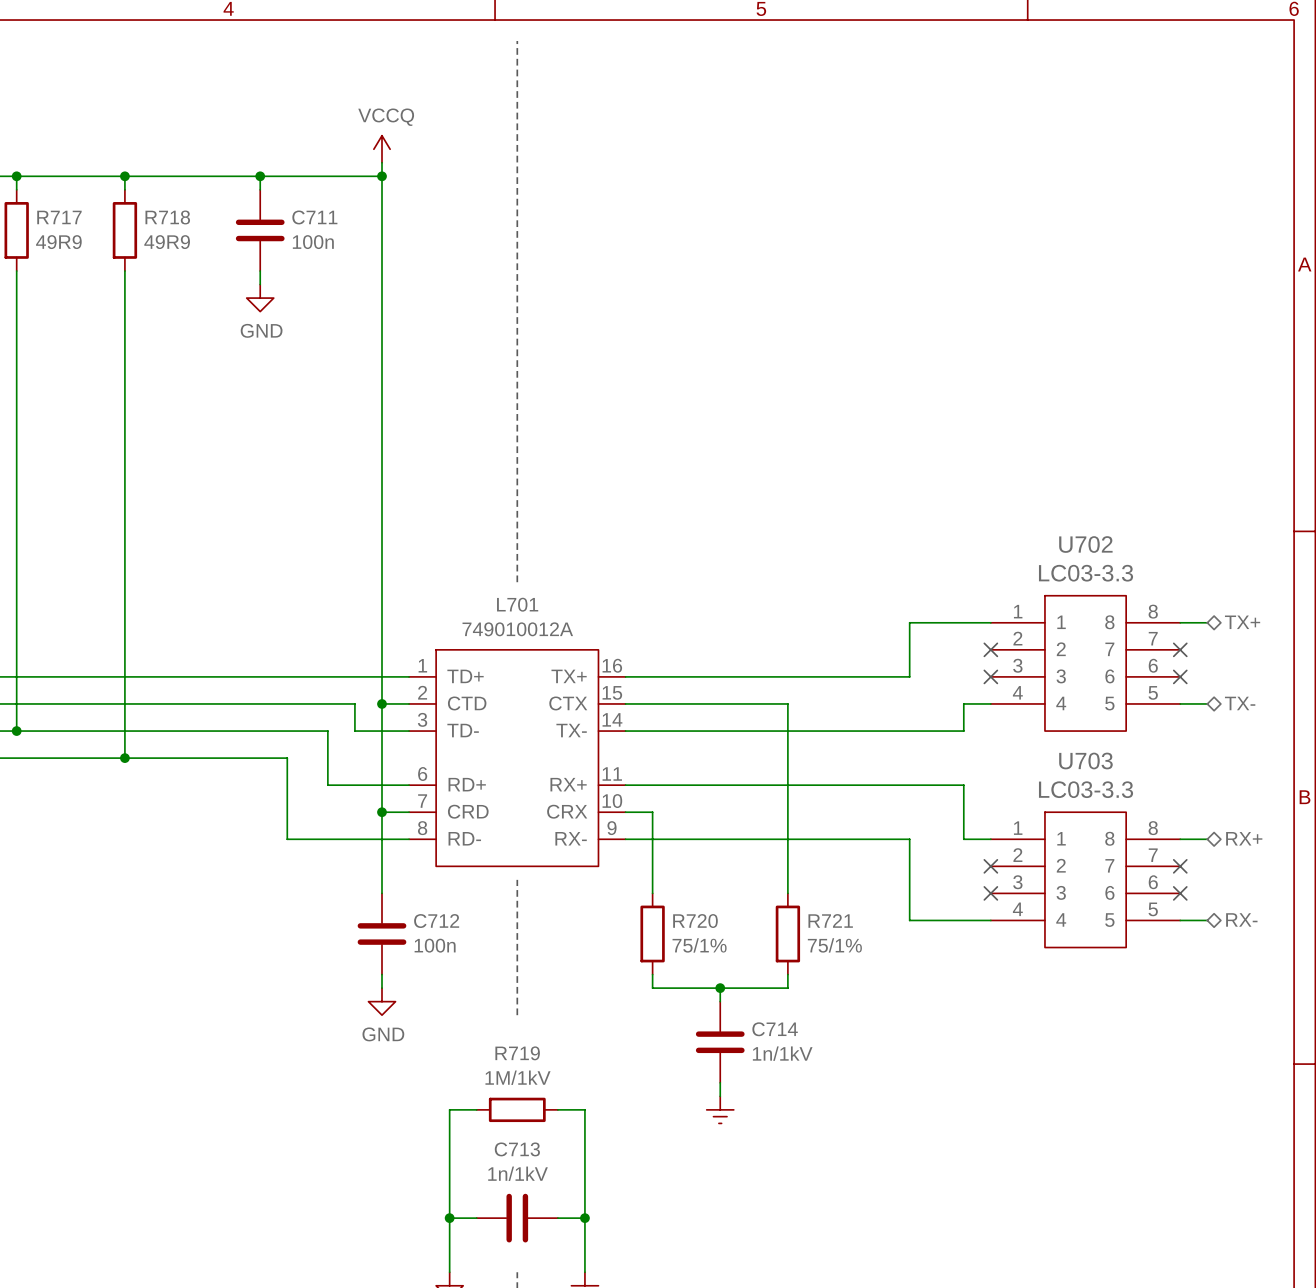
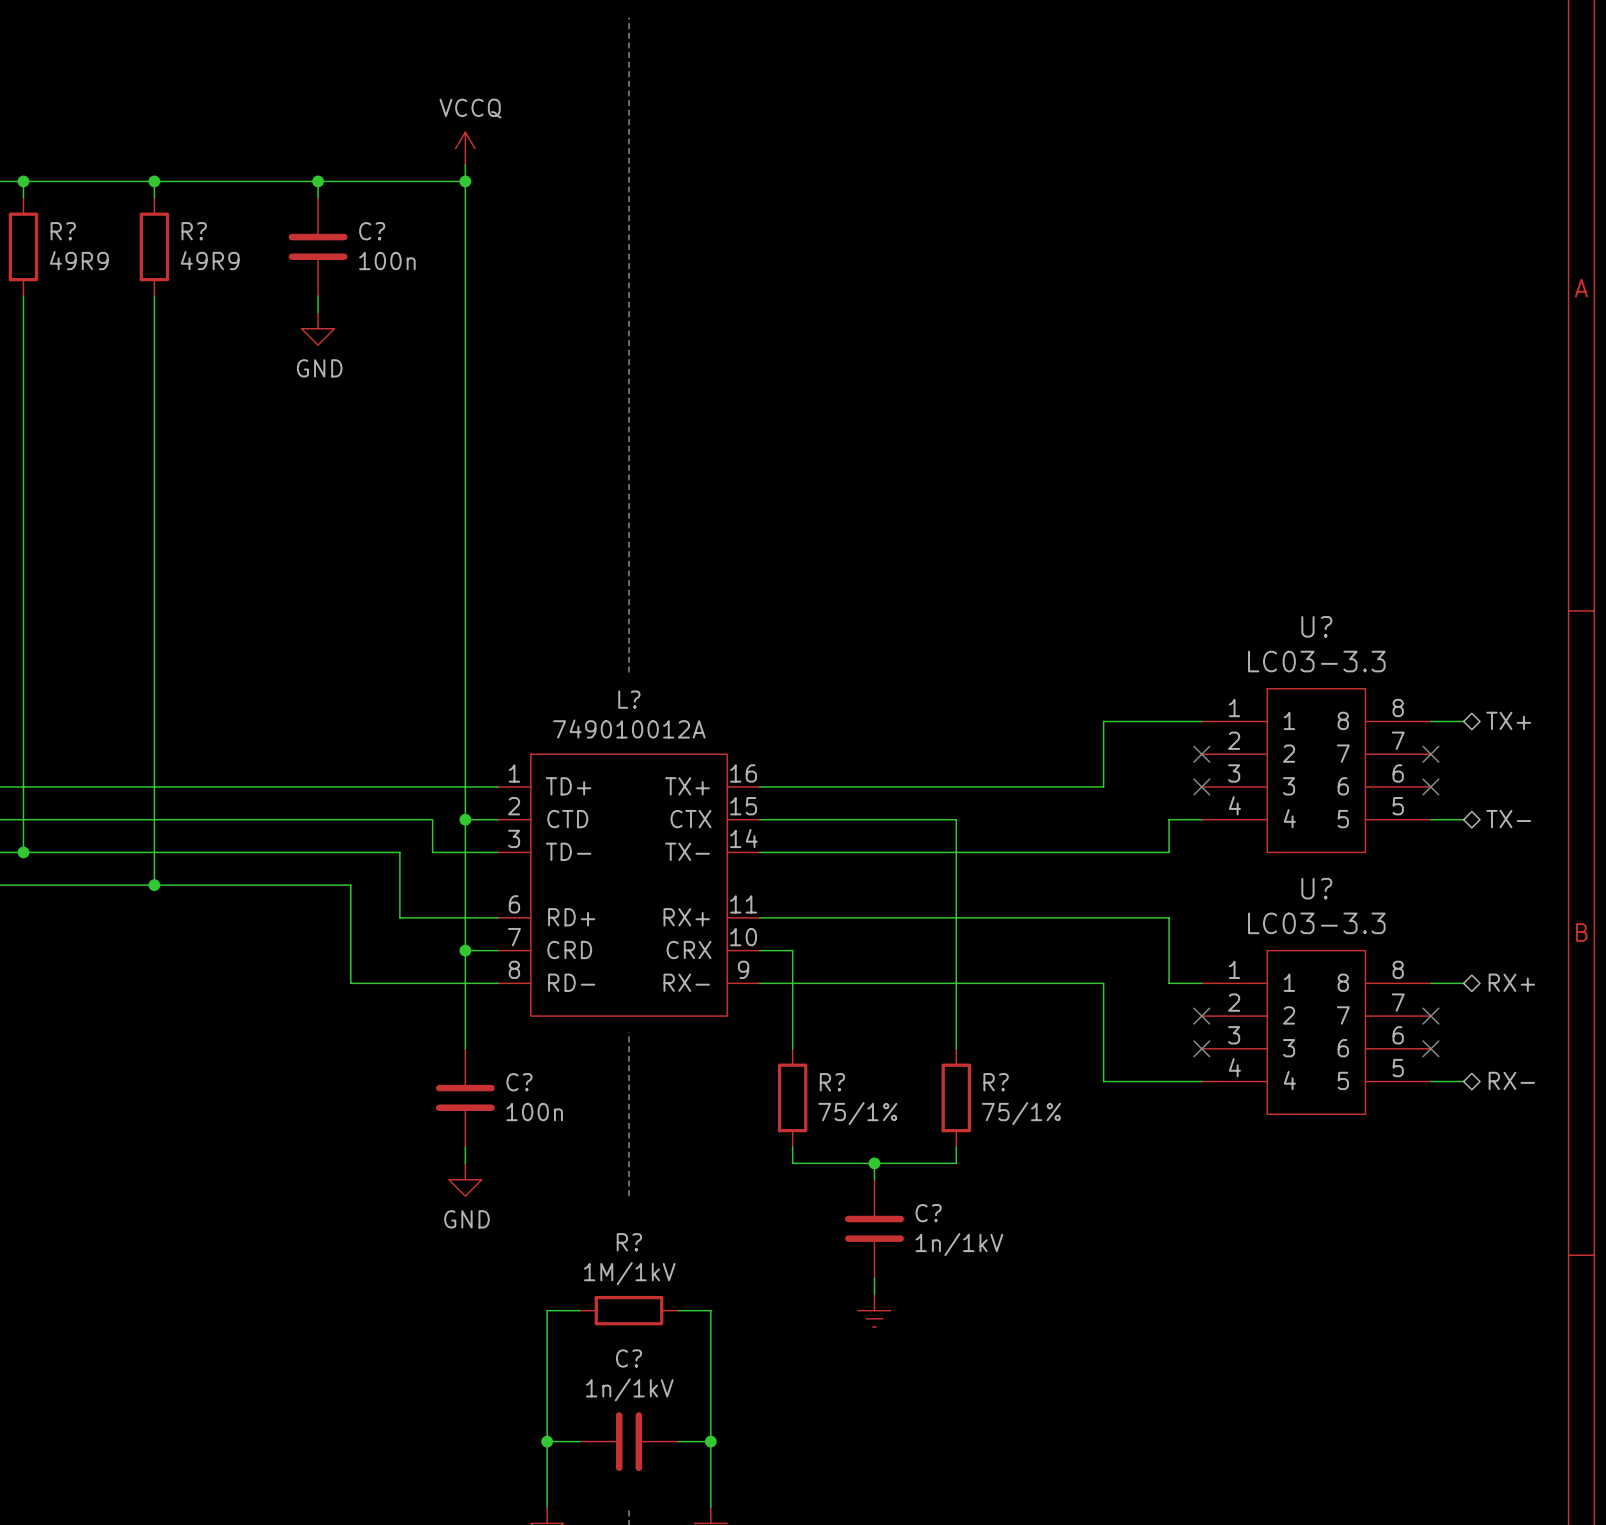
R717 name: R717 (59, 217) -> R? (63, 231)
R718 name: R718 (167, 217) -> R? (194, 231)
C711 name: C711 (314, 217) -> C? (372, 231)
U702 name: U702 (1085, 544) -> U? (1316, 626)
L701 name: L701 (517, 604) -> L? (629, 699)
U703 name: U703 (1085, 761) -> U? (1316, 888)
R721 name: R721 (830, 920) -> R? (996, 1082)
C712 name: C712 (436, 921) -> C? (519, 1082)
R720 name: R720 (695, 921) -> R? (832, 1082)
C714 name: C714 (775, 1029) -> C? (928, 1213)
R719 name: R719 (517, 1053) -> R? (629, 1242)
C713 name: C713 (517, 1149) -> C? (629, 1358)

